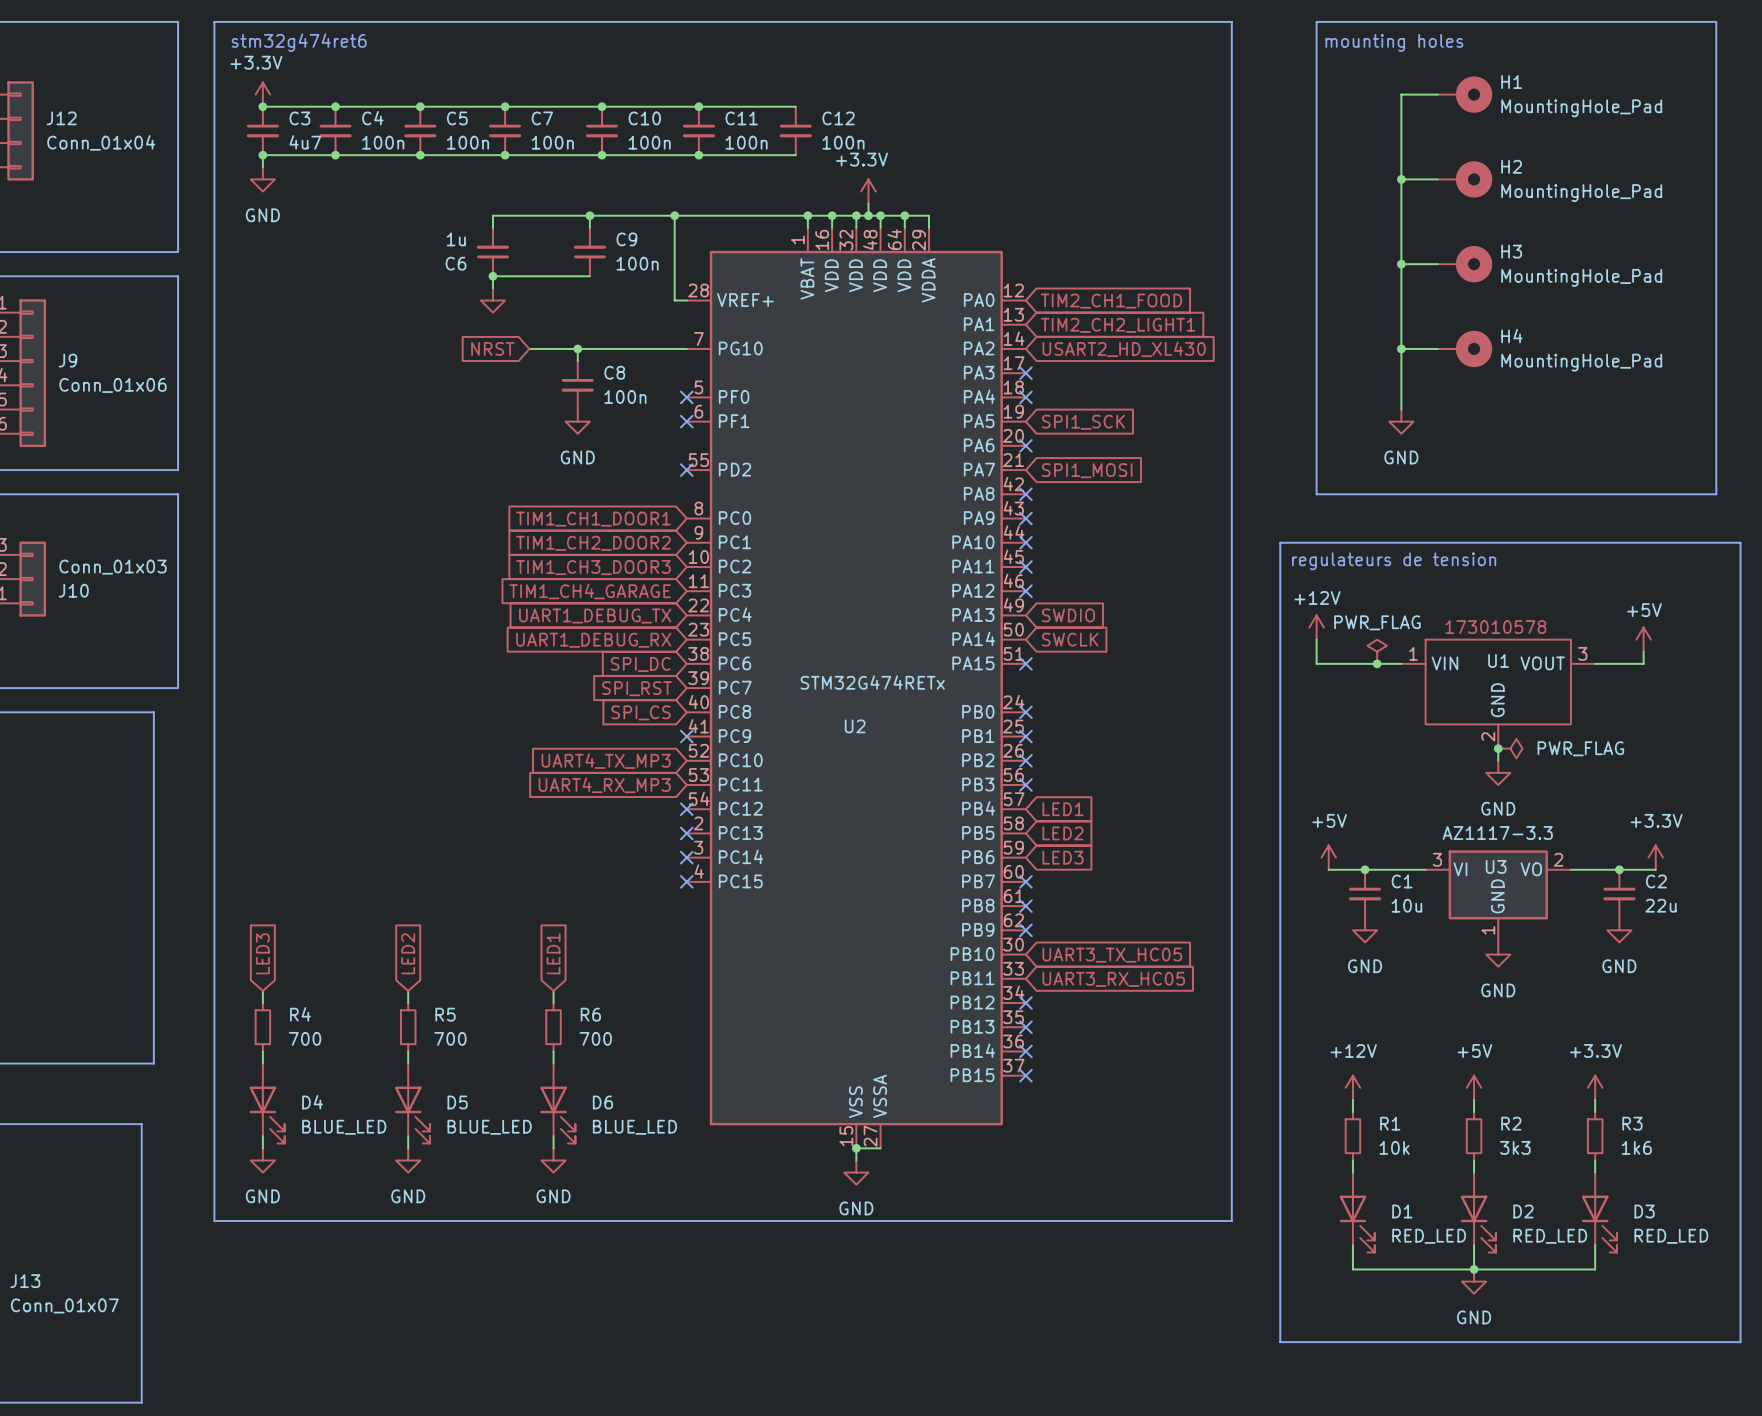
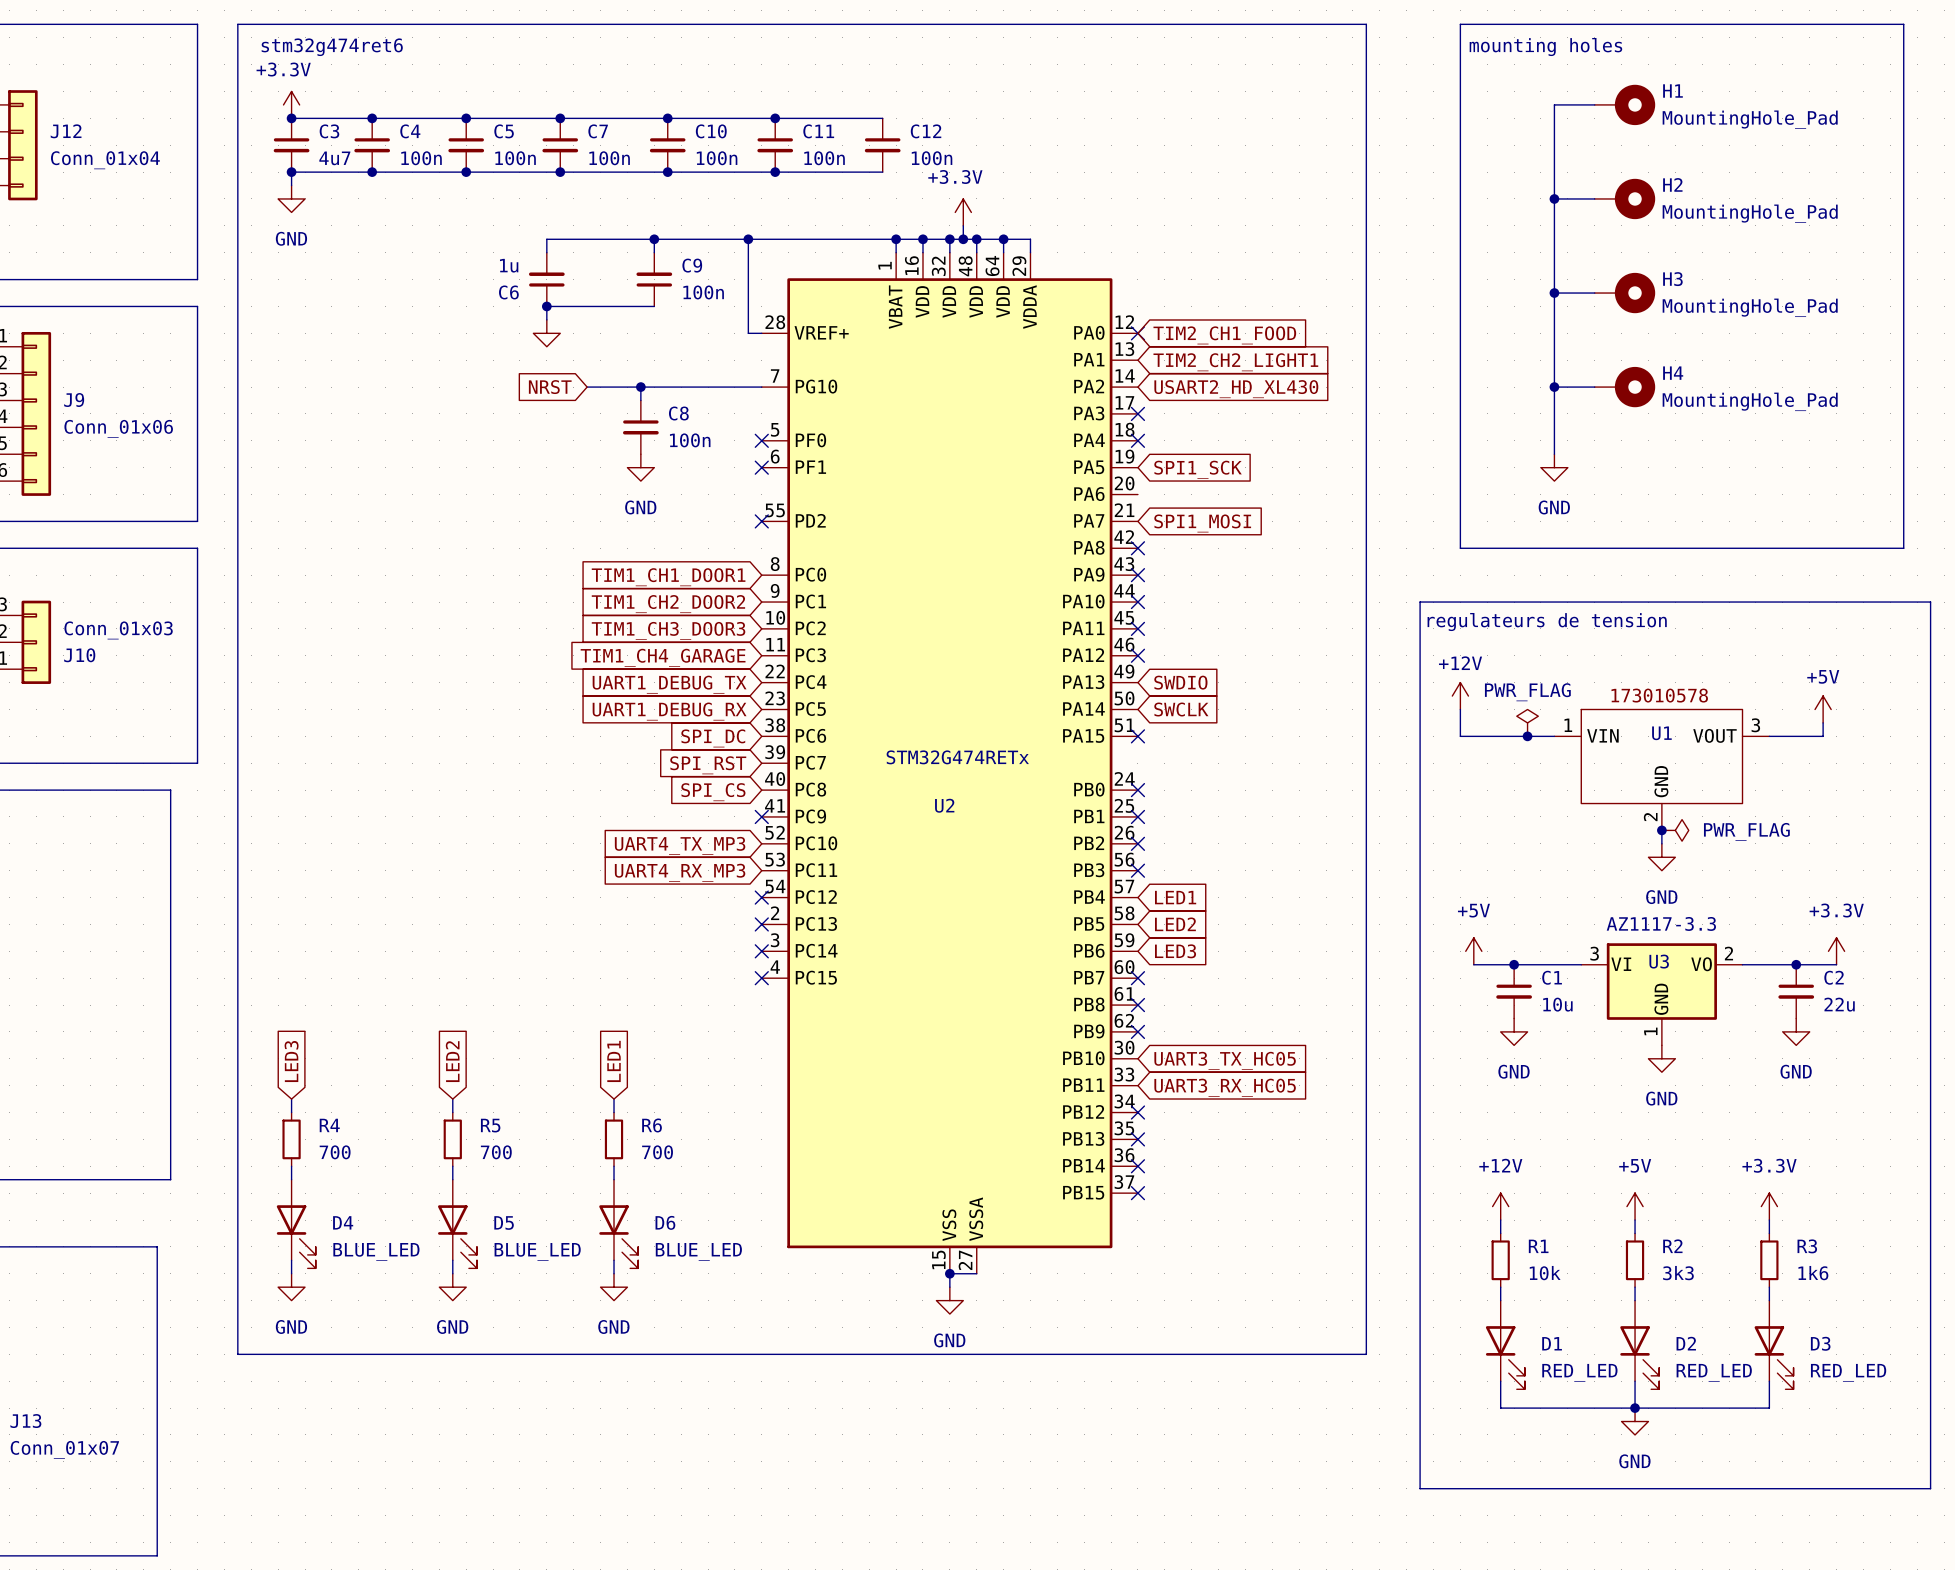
no-connect mark: none -> (1137, 333)
no-connect mark: (1025, 445) -> none

